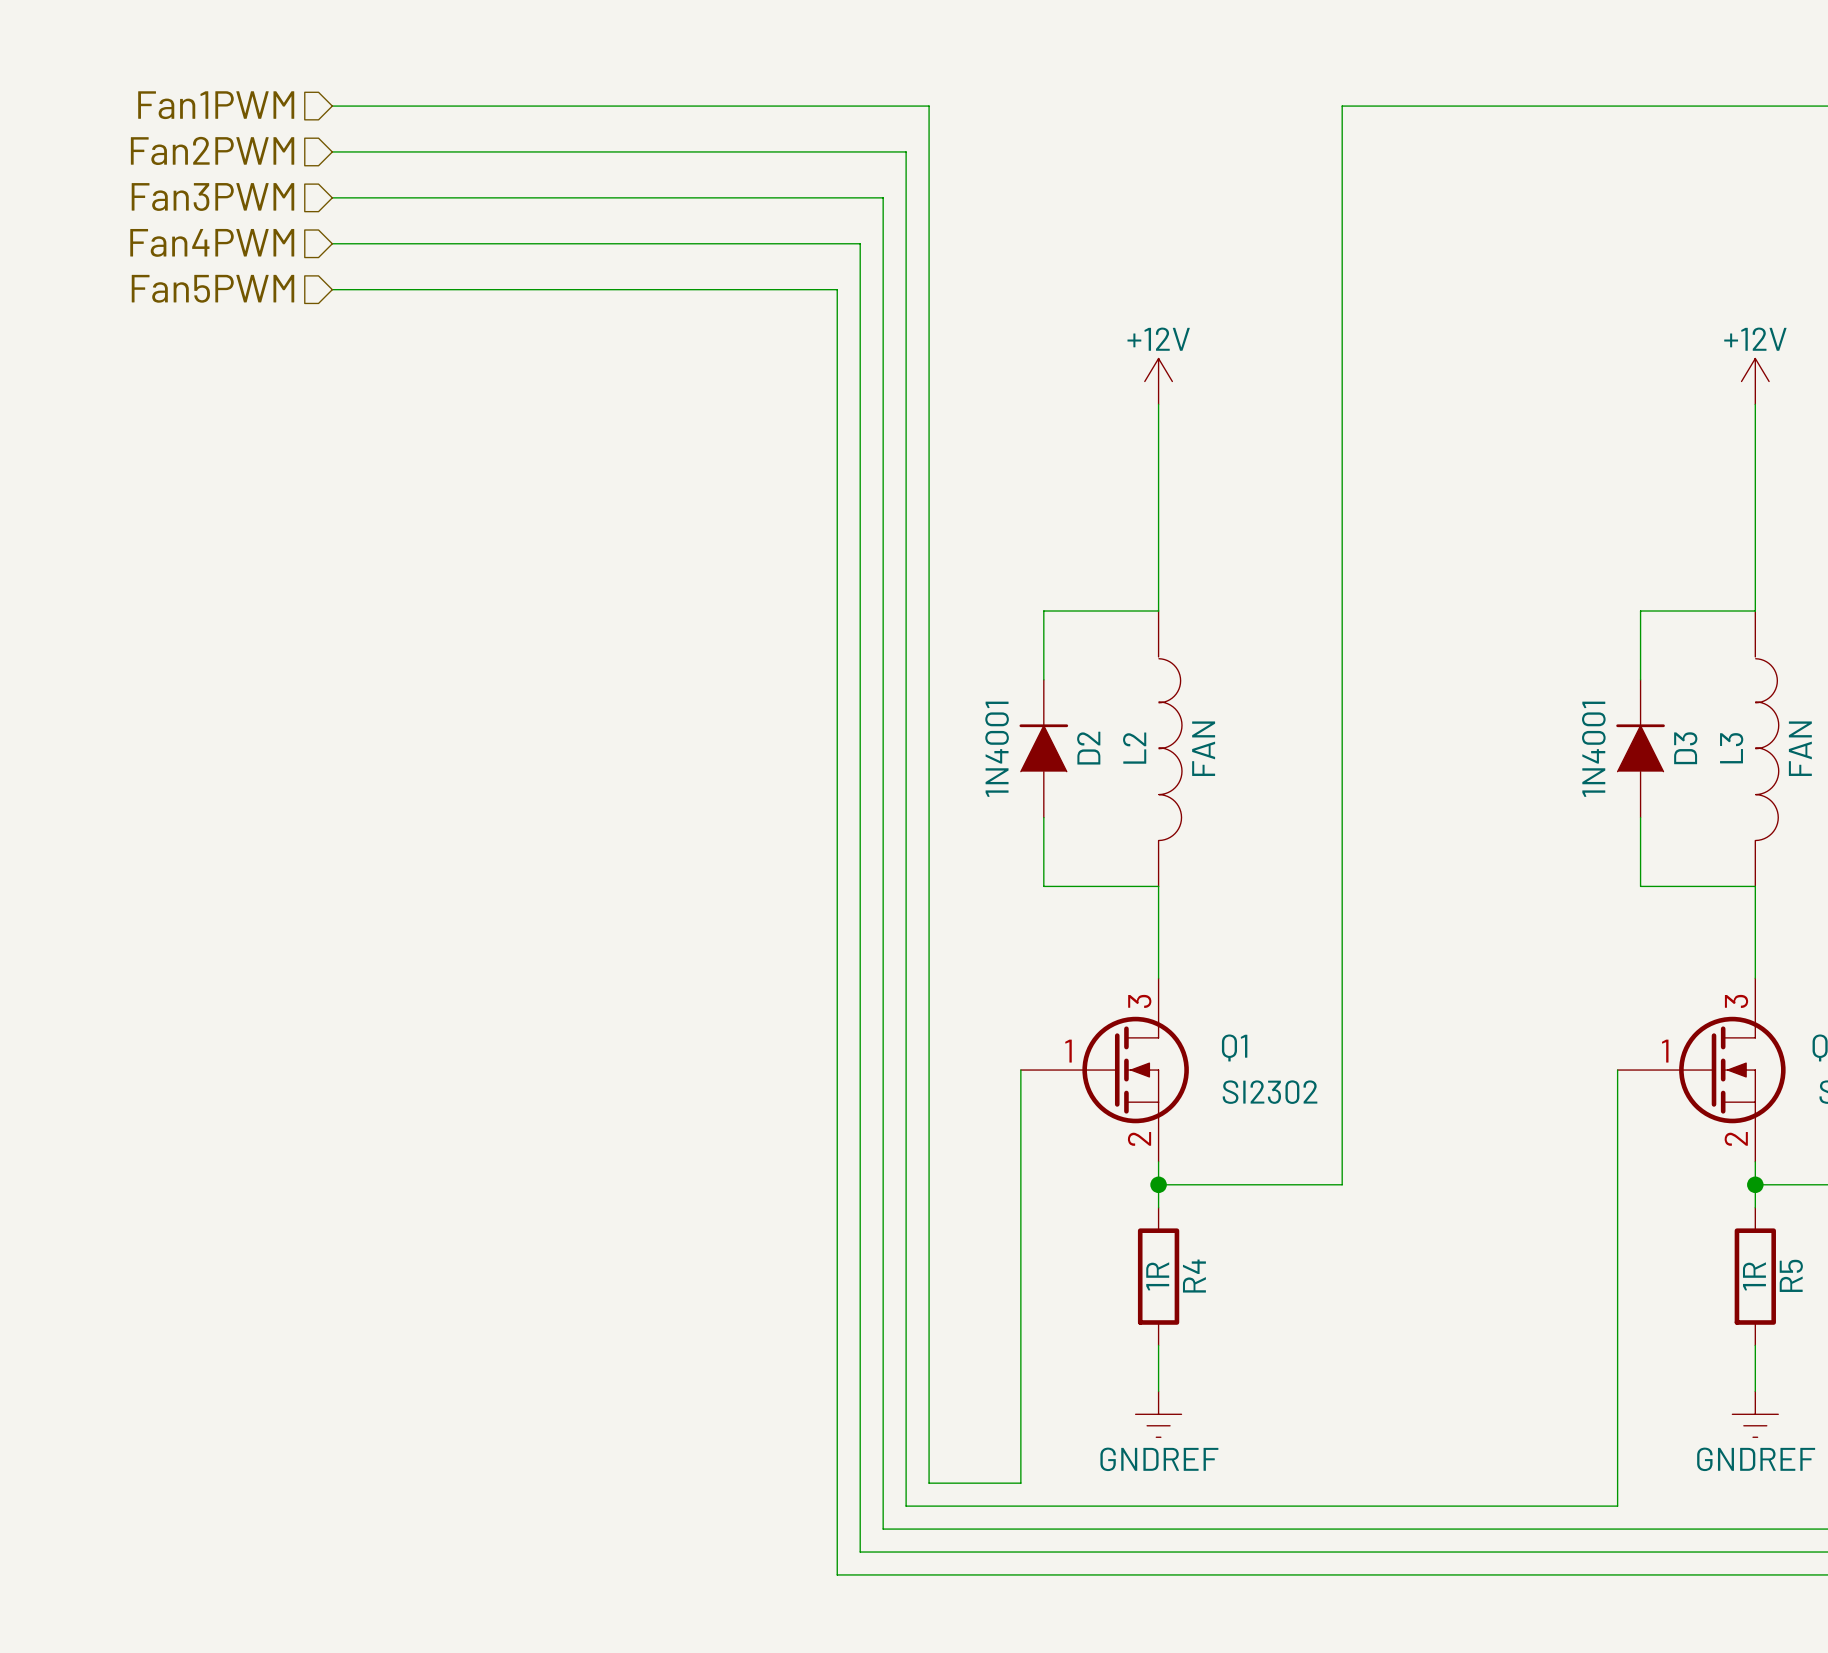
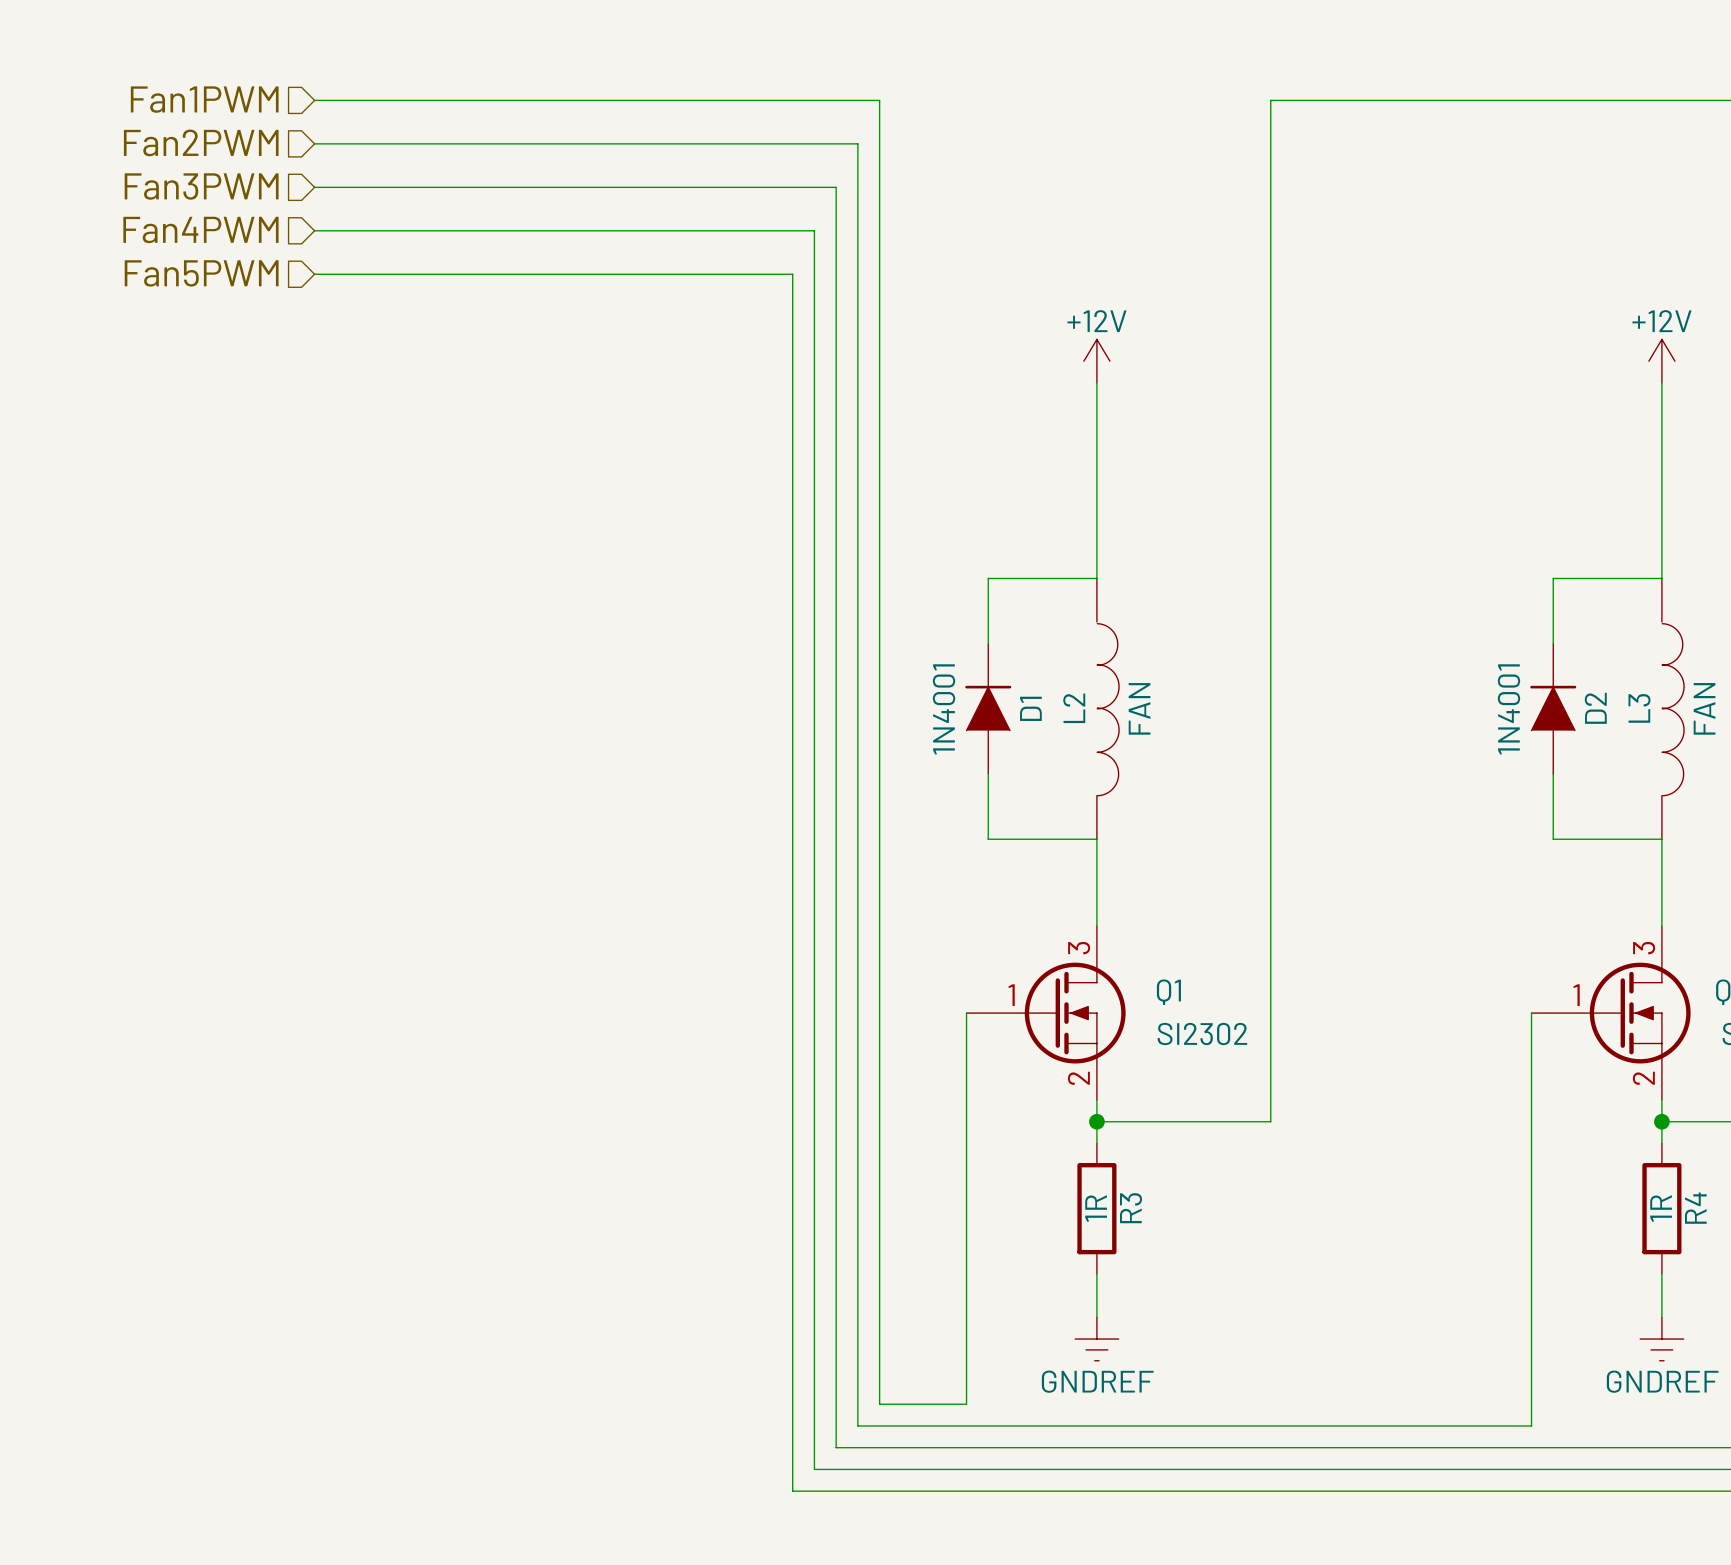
D2 name: D2 (1088, 748) -> D1 (1030, 708)
D3 name: D3 (1685, 748) -> D2 (1595, 708)
R5 name: R5 (1791, 1275) -> R4 (1695, 1208)
R4 name: R4 (1194, 1276) -> R3 (1131, 1208)

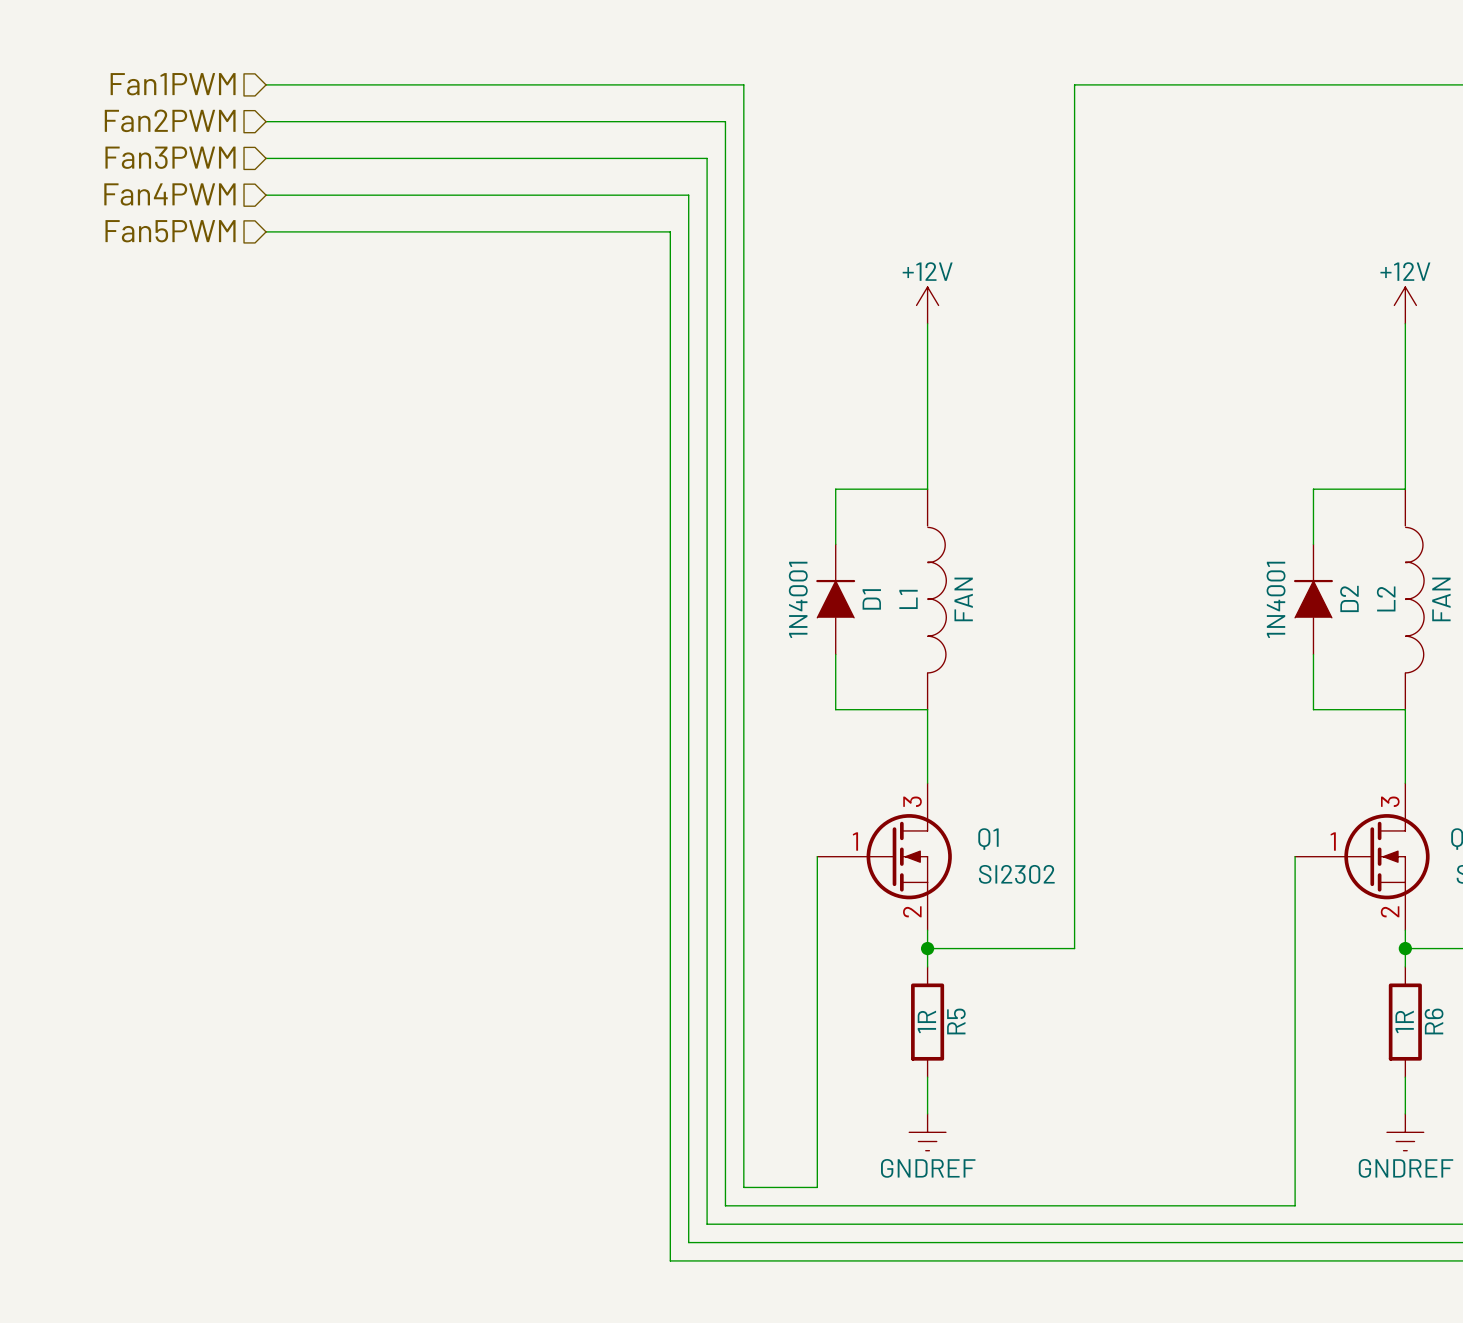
L2 name: L2 (1074, 708) -> L1 (908, 599)
L3 name: L3 (1639, 708) -> L2 (1386, 598)
R3 name: R3 (1131, 1208) -> R5 (956, 1021)
R4 name: R4 (1695, 1208) -> R6 (1434, 1021)

